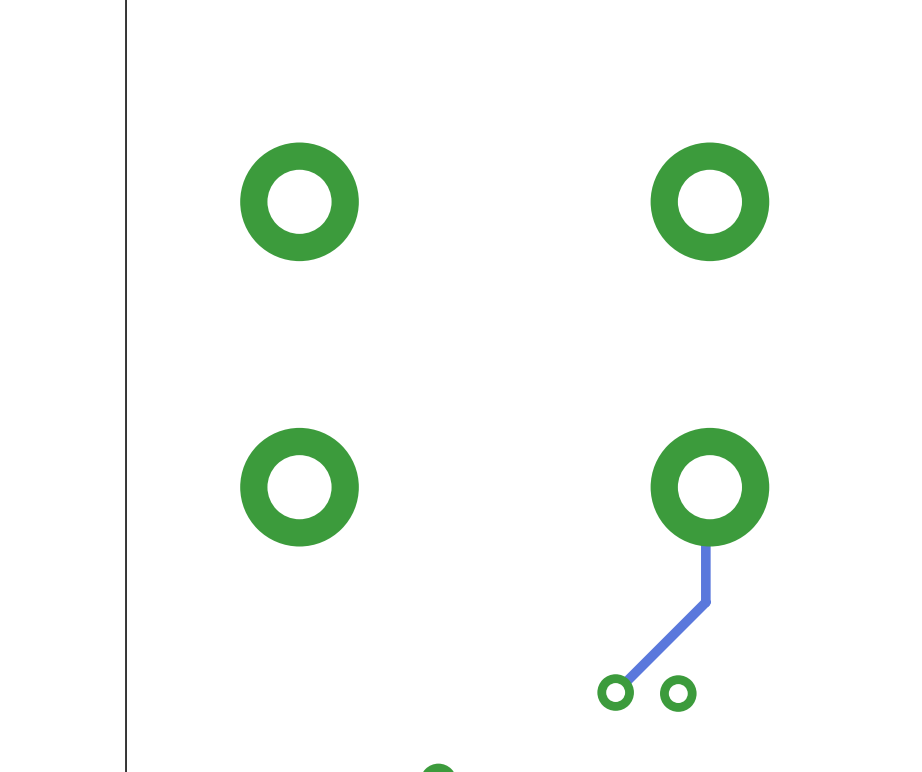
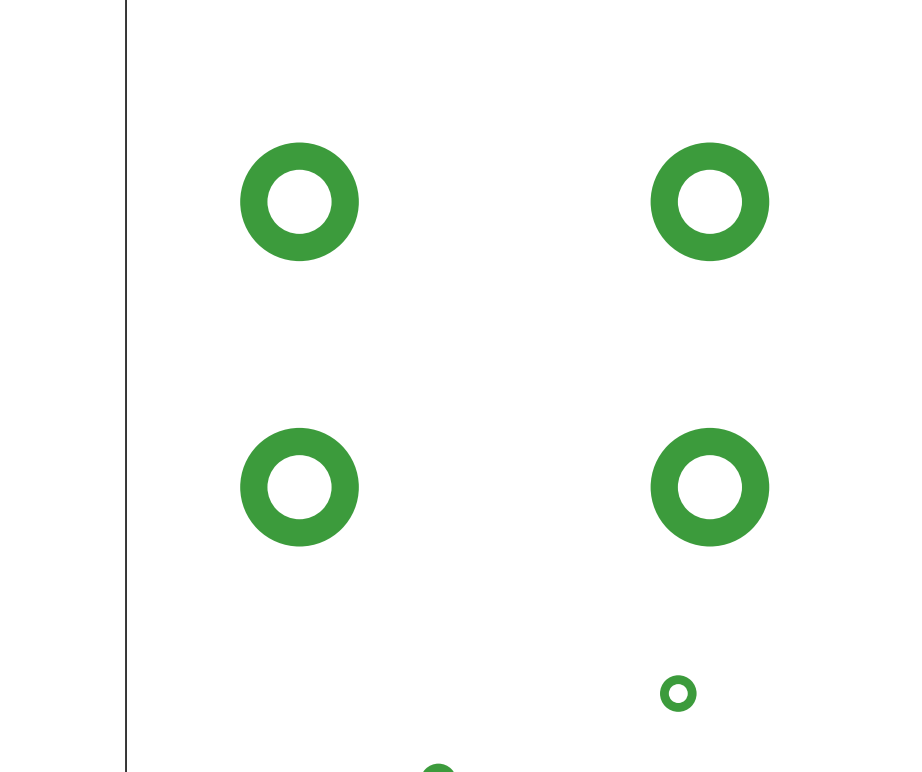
track: (709, 487) (705, 492) (705, 602) (615, 692) -> none
via: (615, 692) -> none

